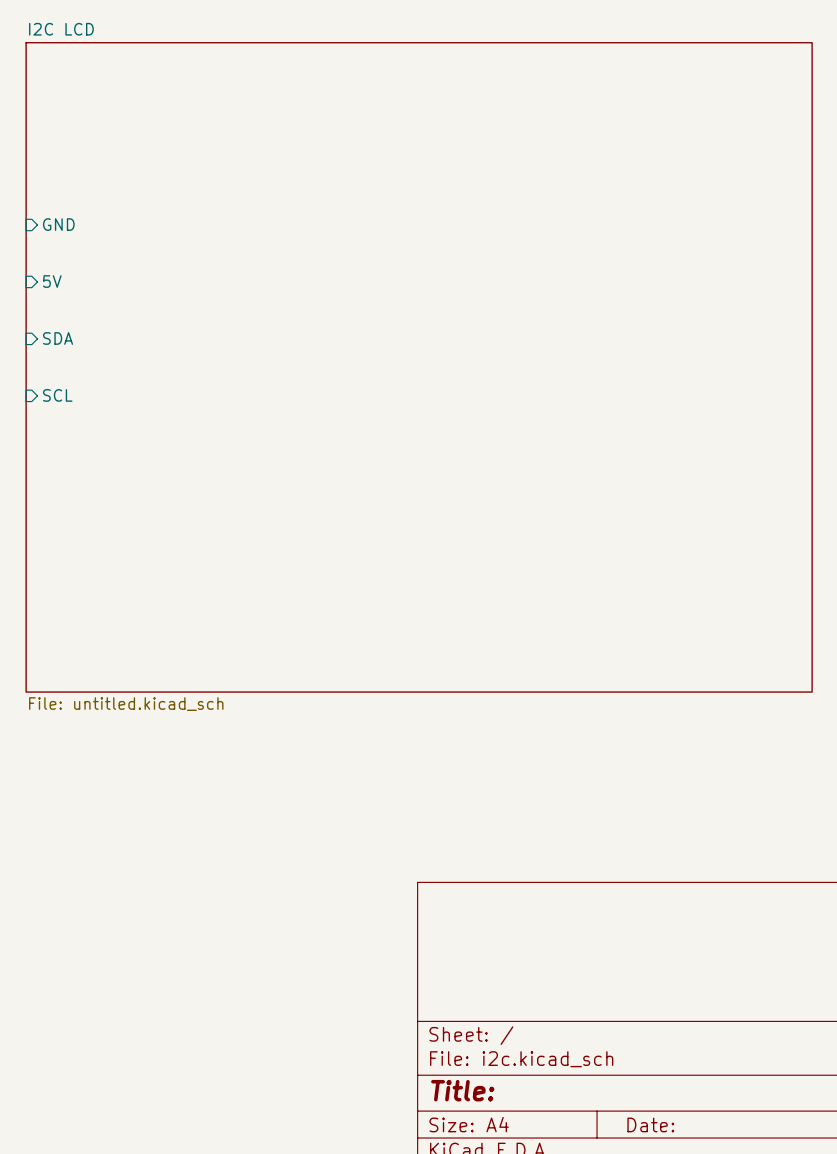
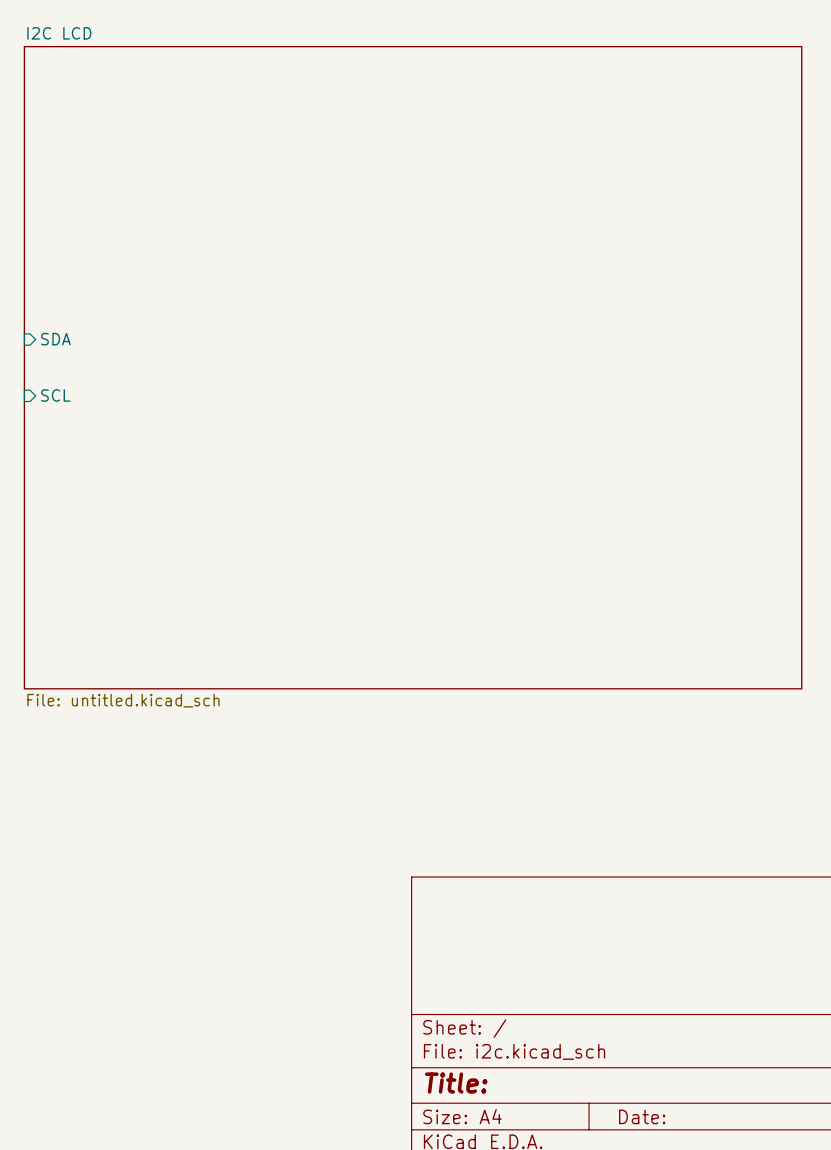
sheet pin: GND (58, 224) -> none
sheet pin: 5V (52, 281) -> none

